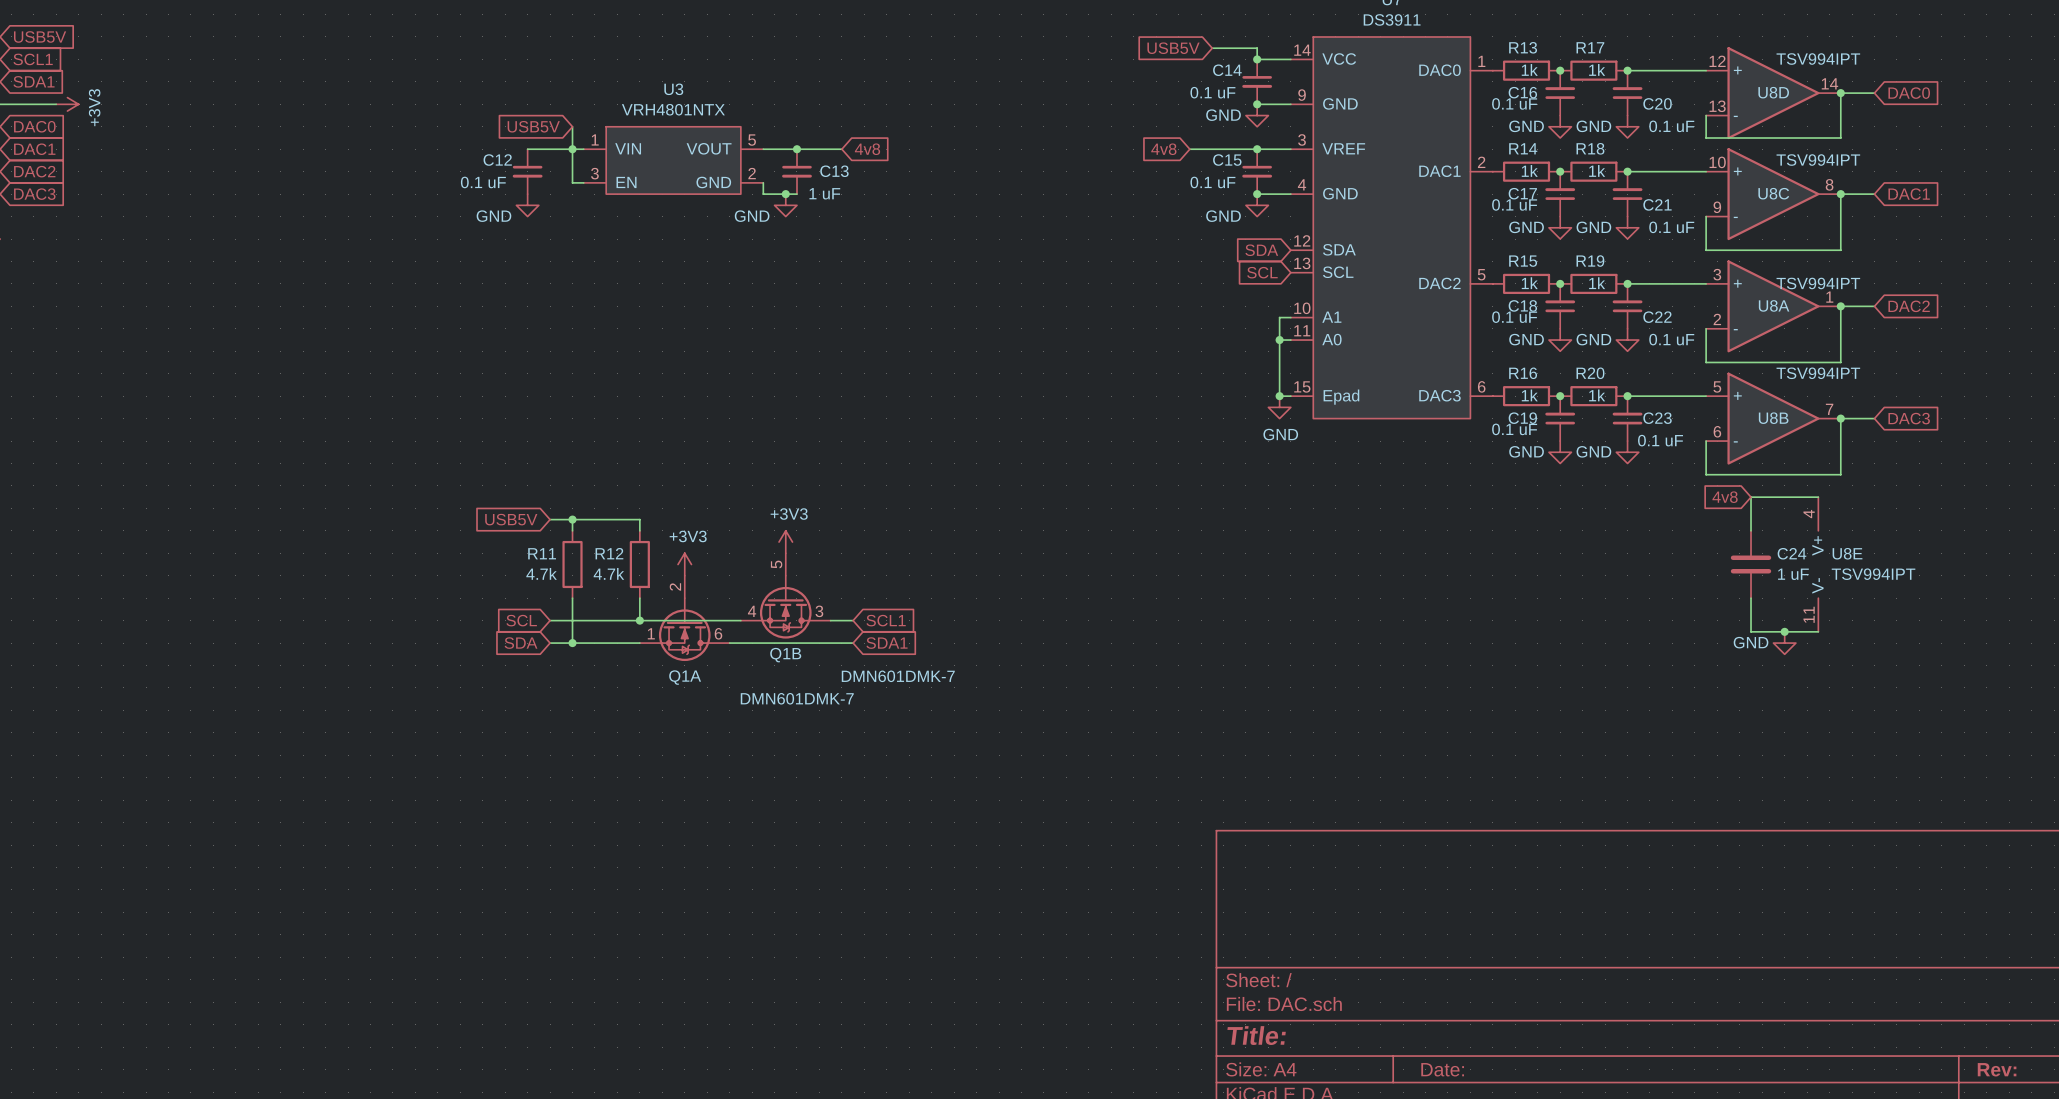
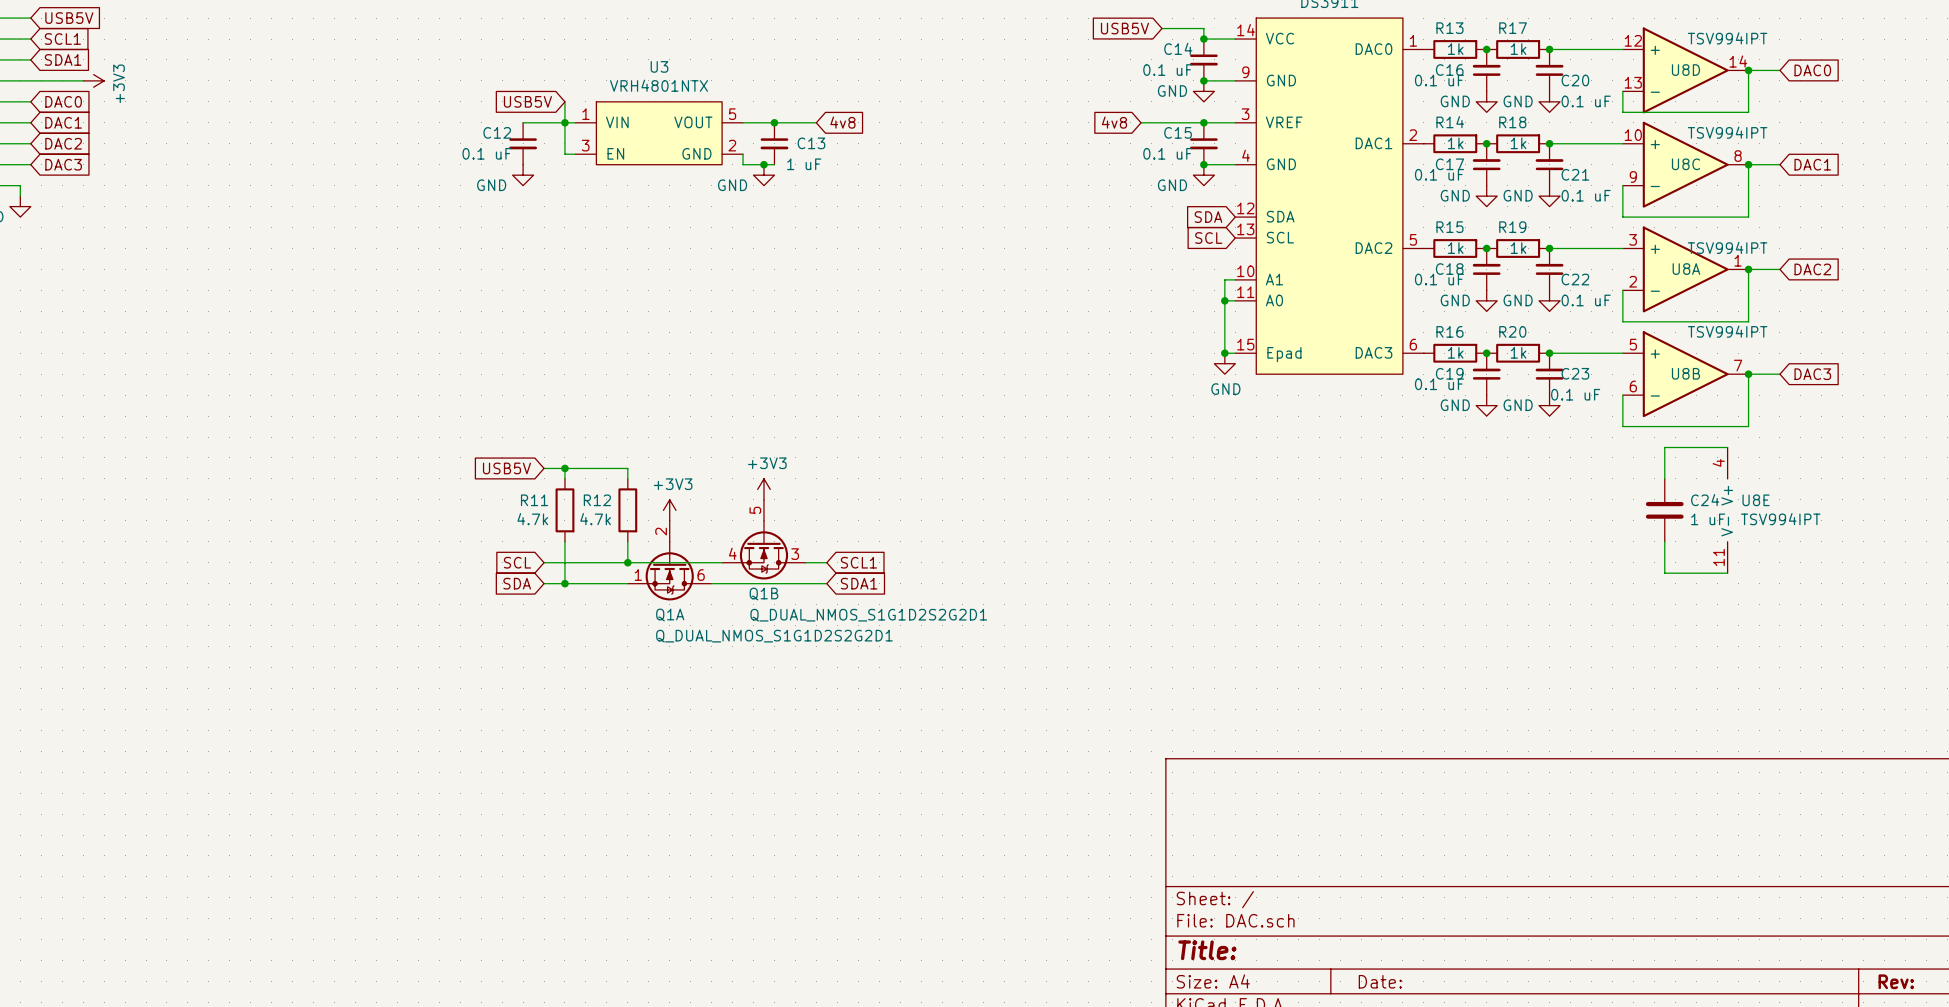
global label: 4v8 (1725, 497) -> none
junction: (1784, 631) -> none
power symbol: GND (1784, 643) -> none
Q1B value: DMN601DMK-7 (898, 676) -> Q_DUAL_NMOS_S1G1D2S2G2D1 (868, 615)
Q1A value: DMN601DMK-7 (797, 698) -> Q_DUAL_NMOS_S1G1D2S2G2D1 (774, 636)

